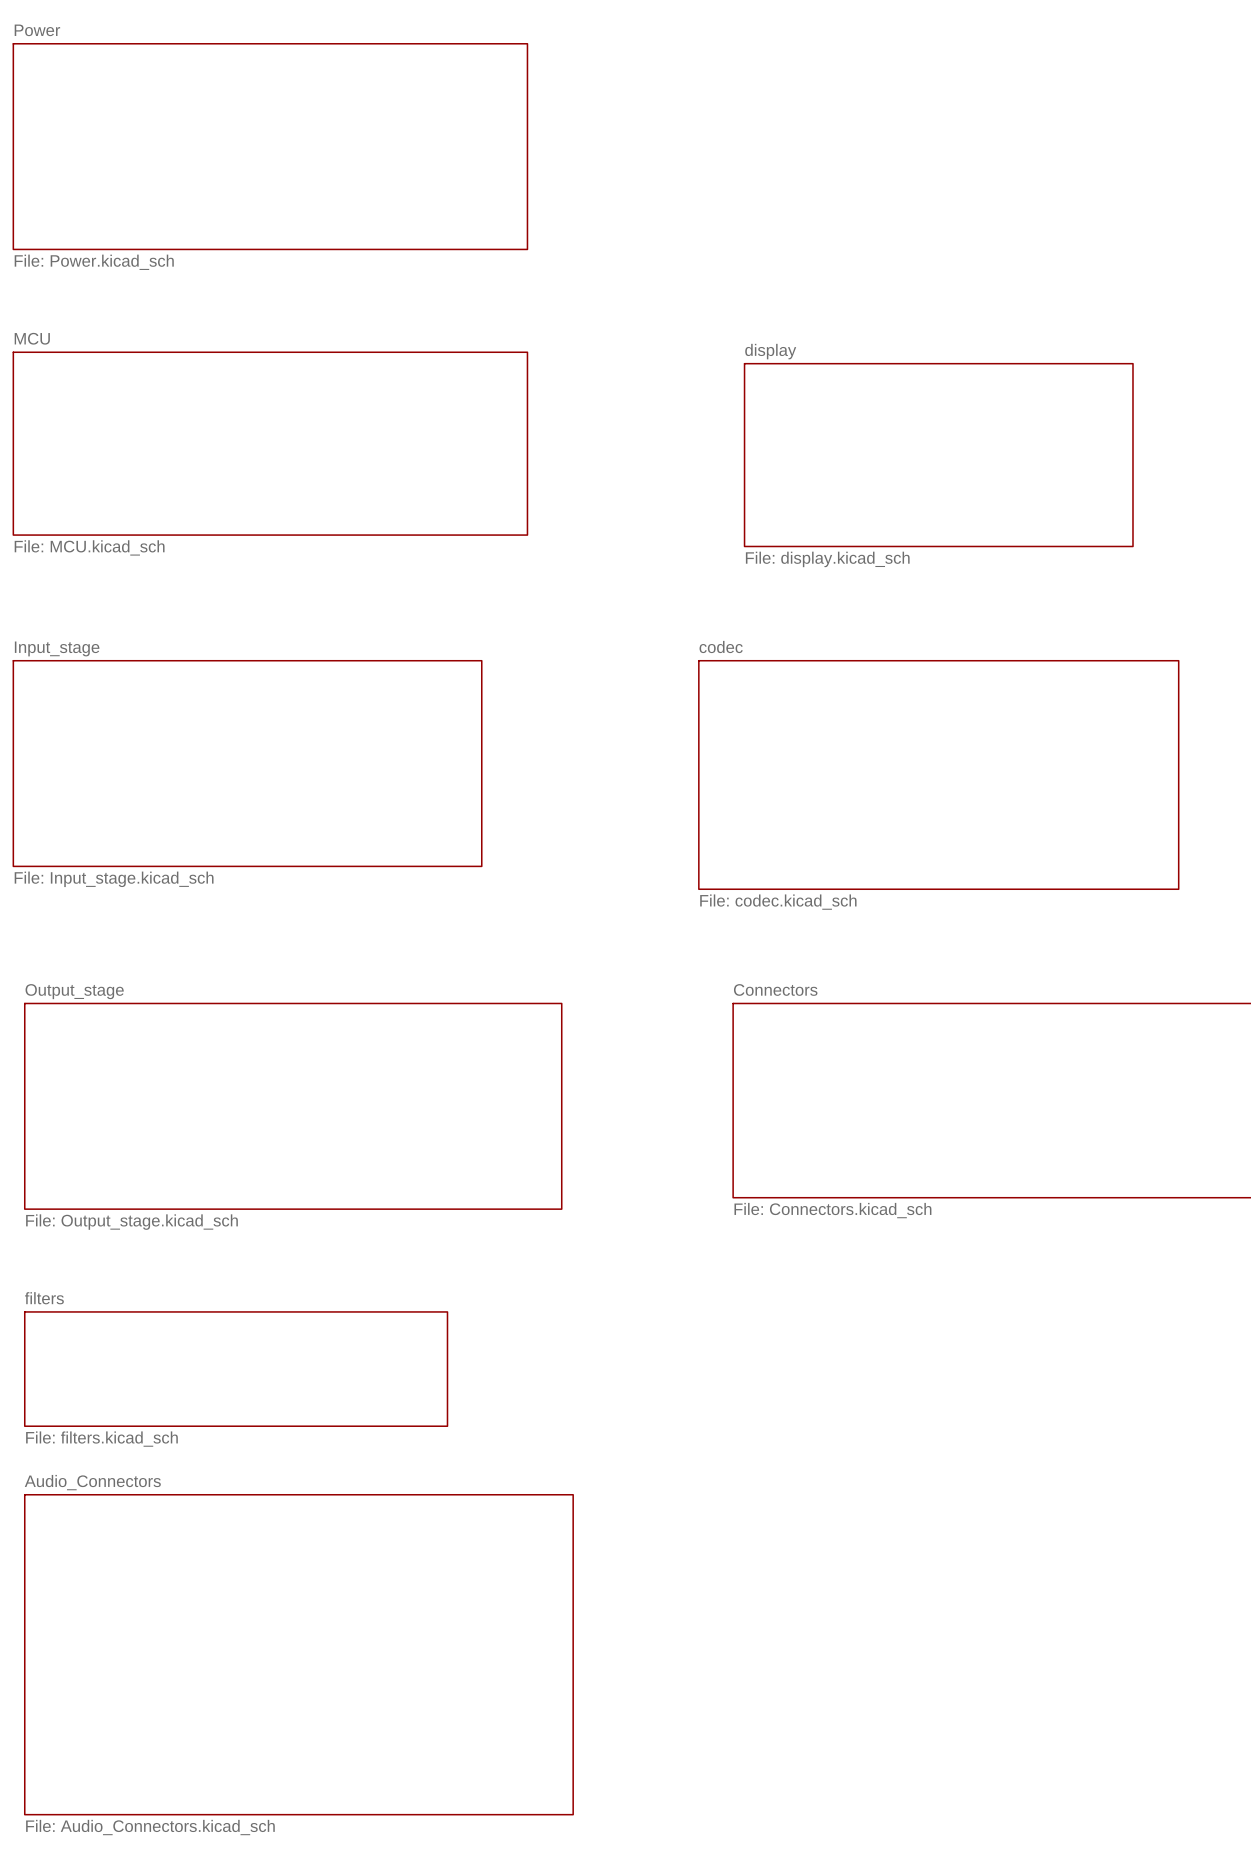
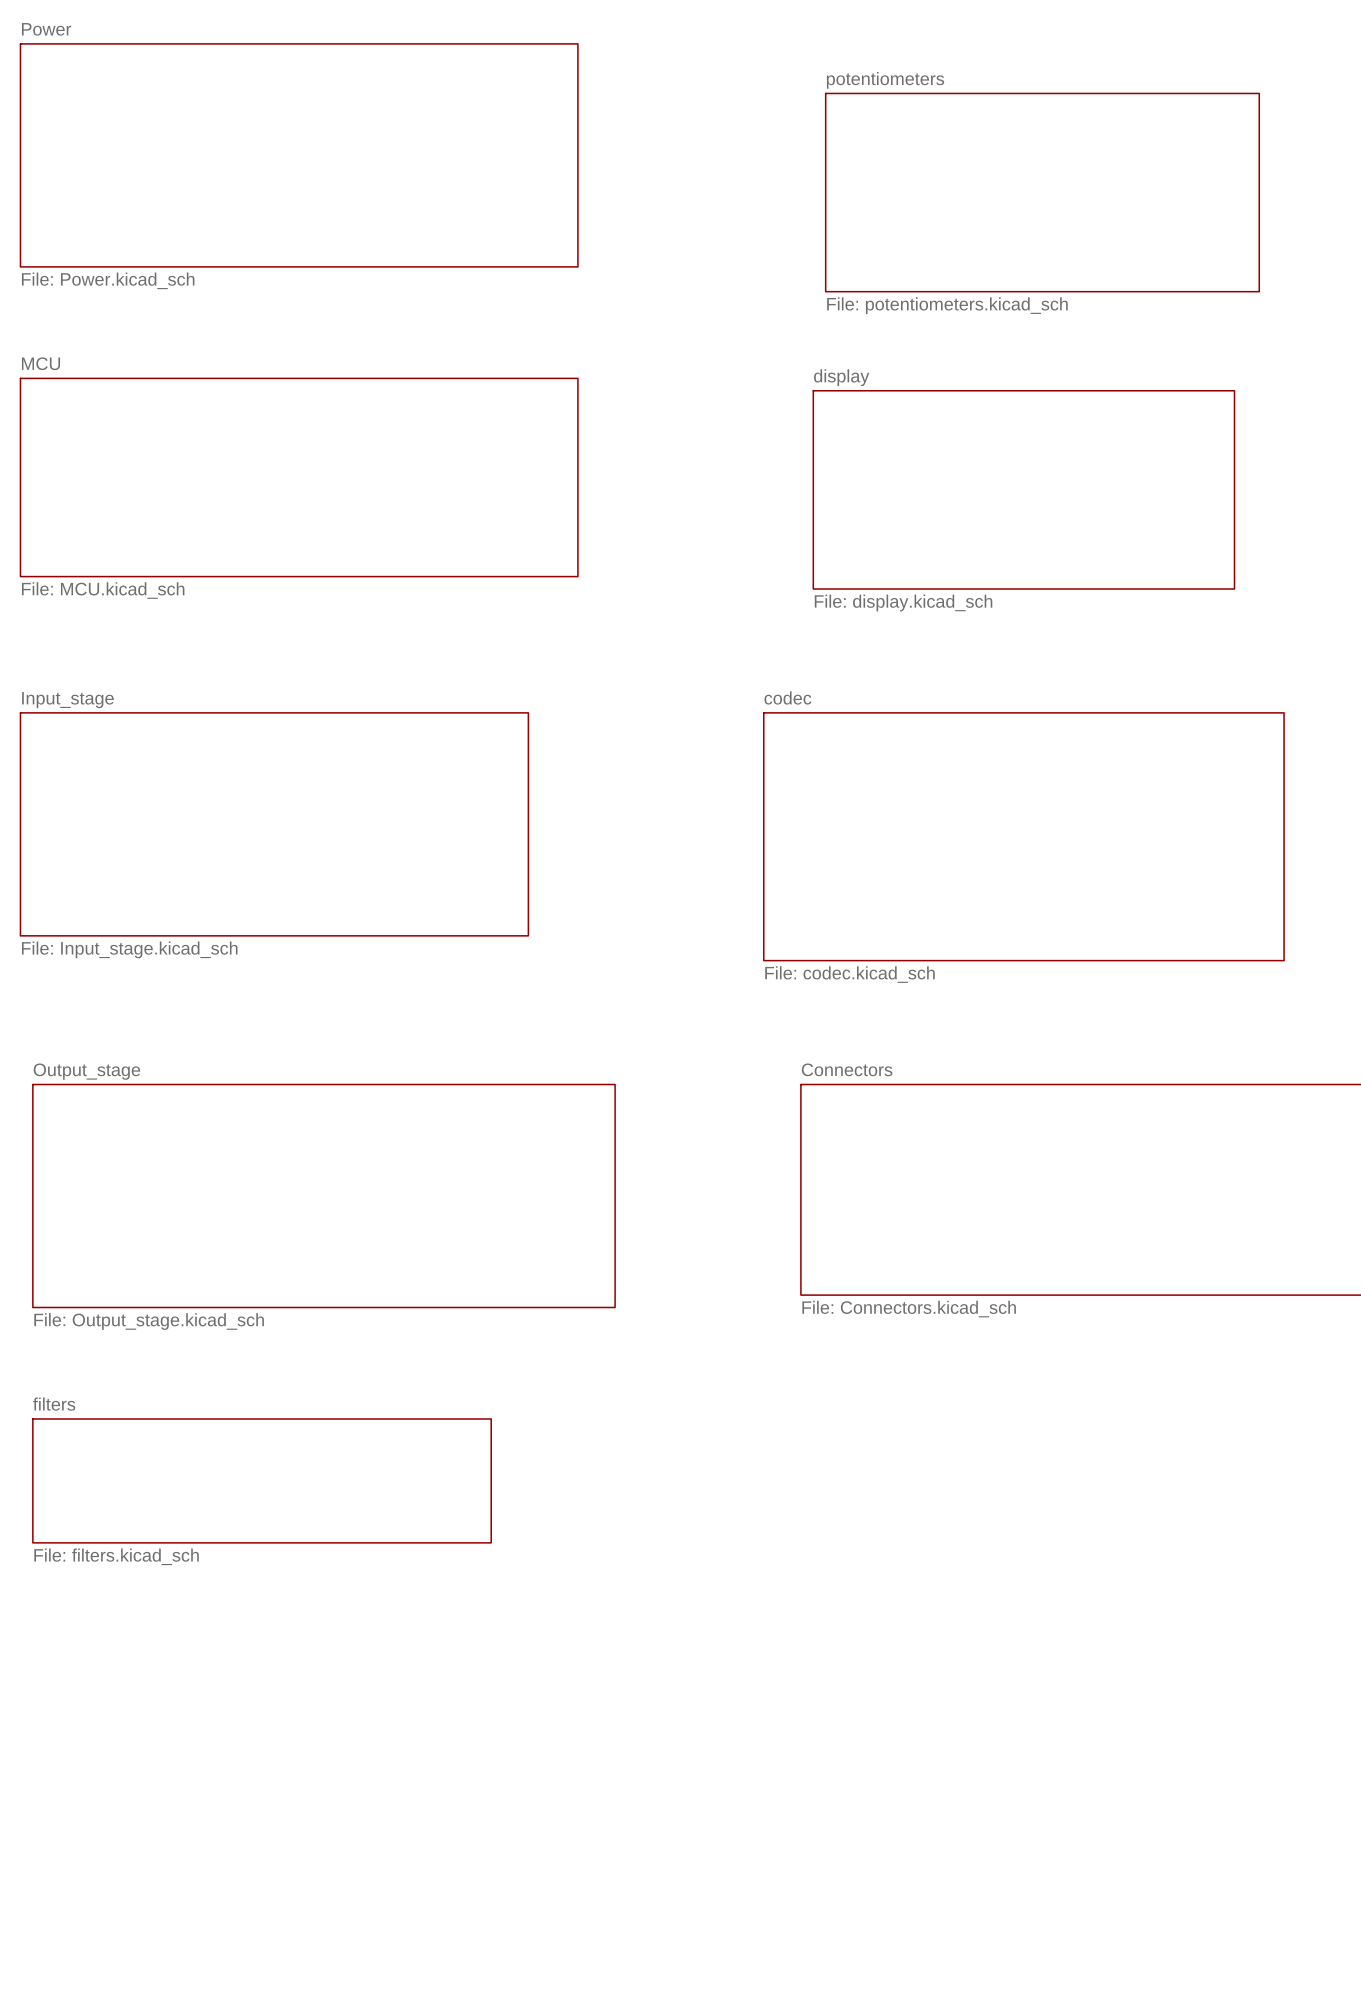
sheet potentiometers: none -> File: potentiometers.kicad_sch (1042, 192)
sheet Audio_Connectors: File: Audio_Connectors.kicad_sch (298, 1654) -> none

